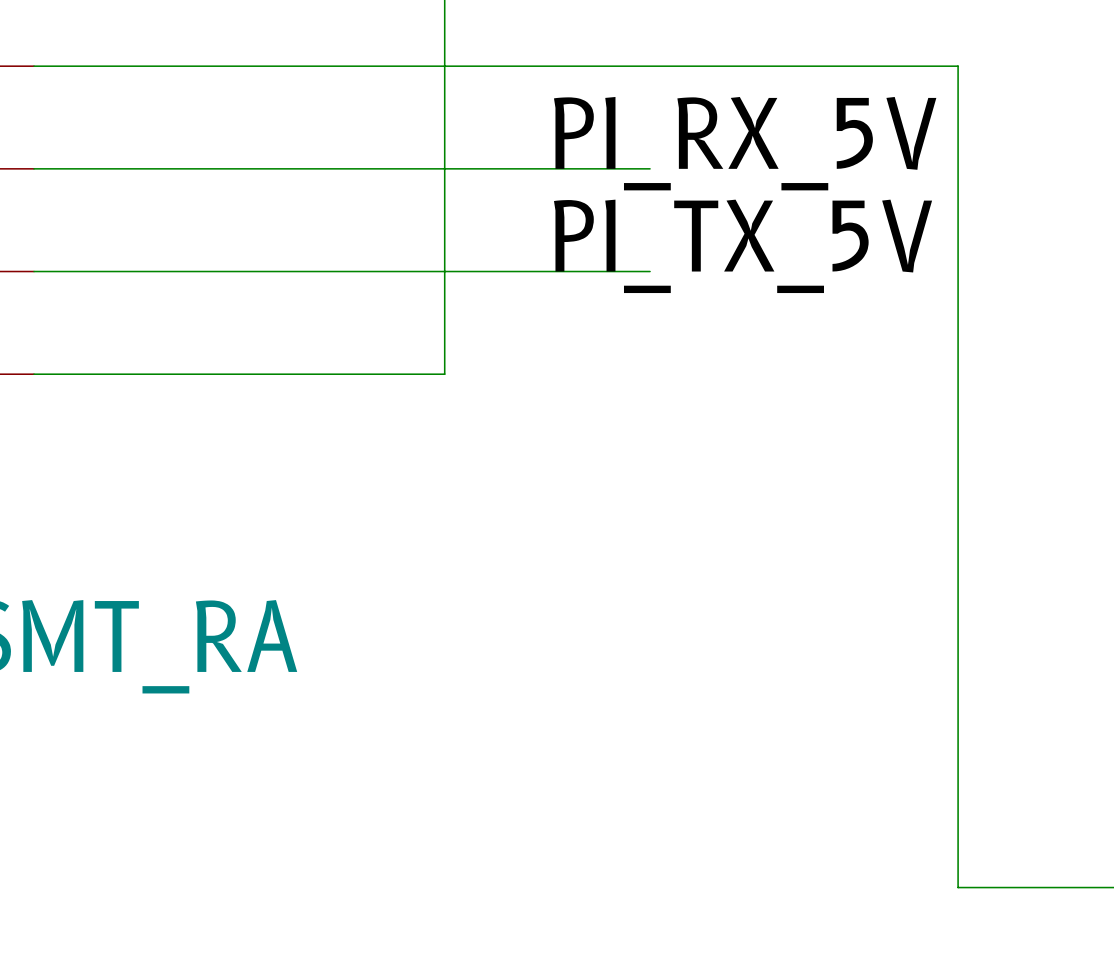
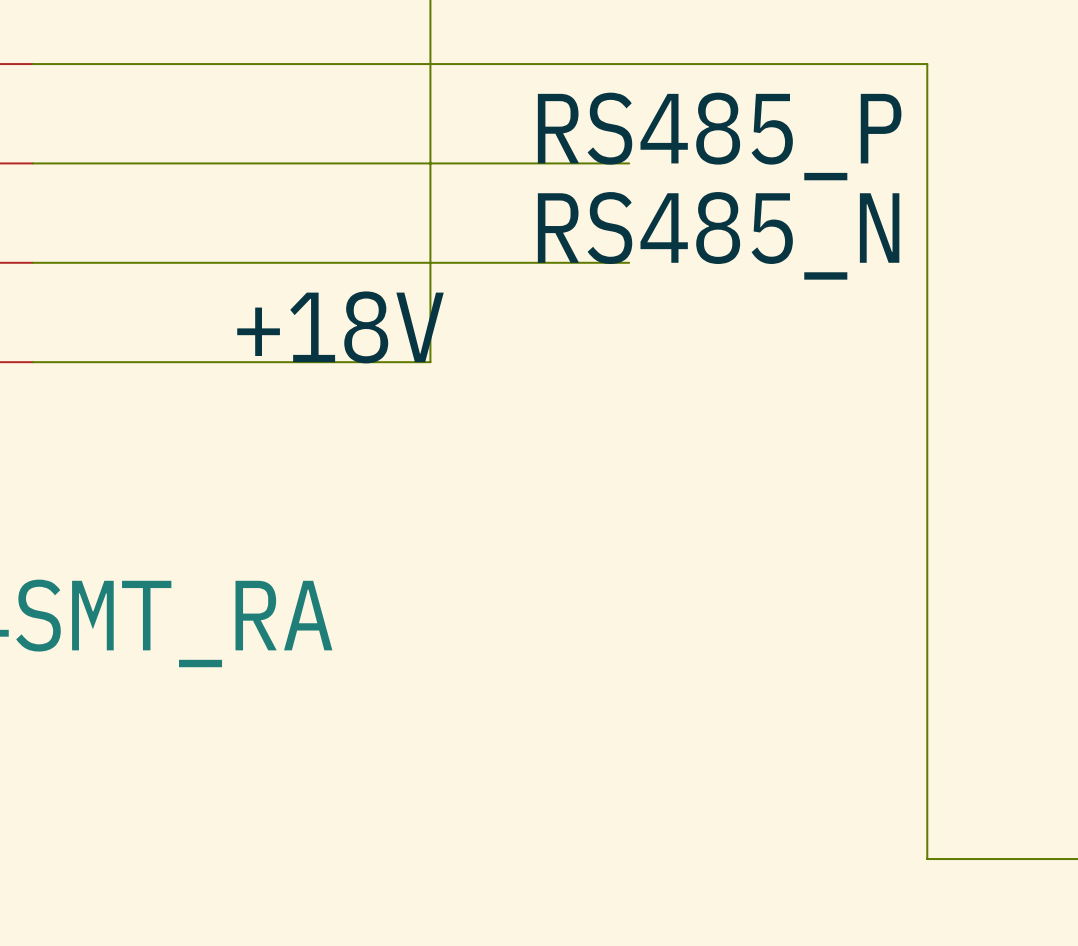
label: PI_RX_5V (745, 143) -> RS485_P (719, 136)
label: PI_TX_5V (743, 246) -> RS485_N (718, 235)
label: none -> +18V (340, 327)

